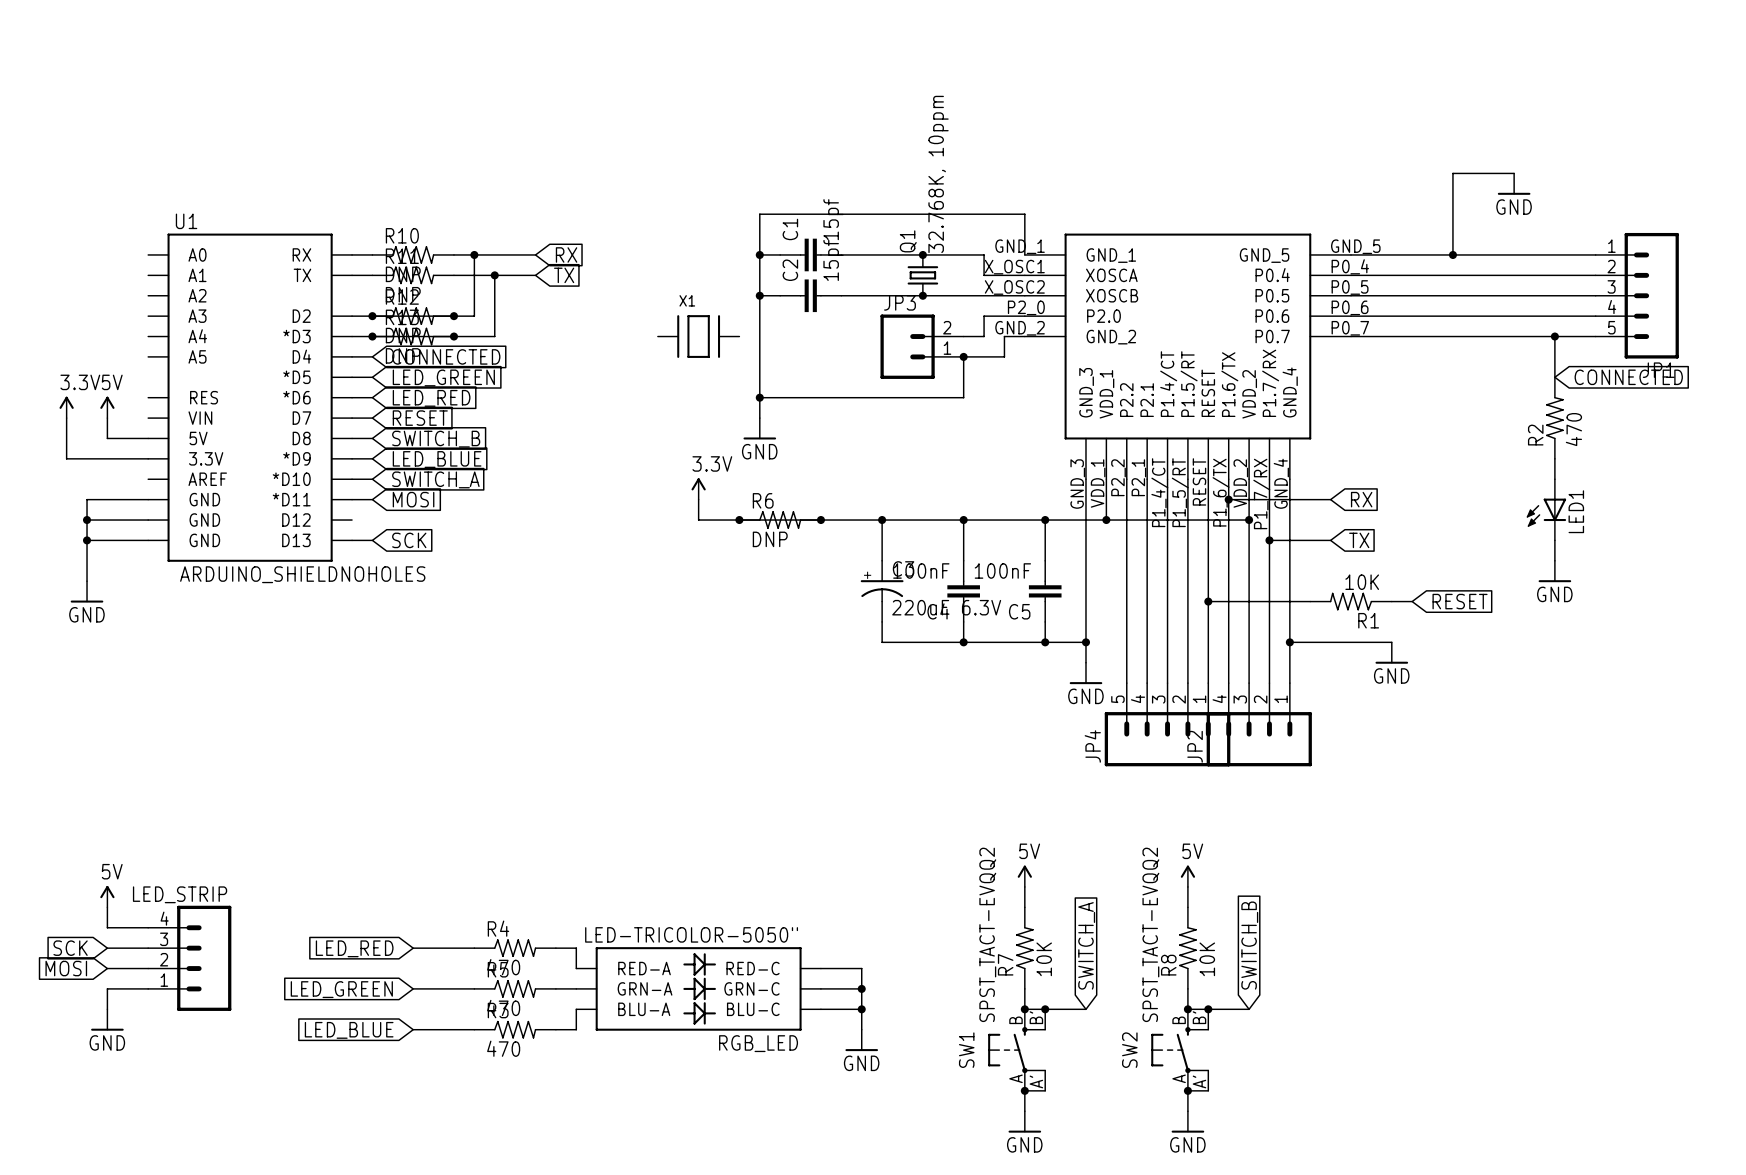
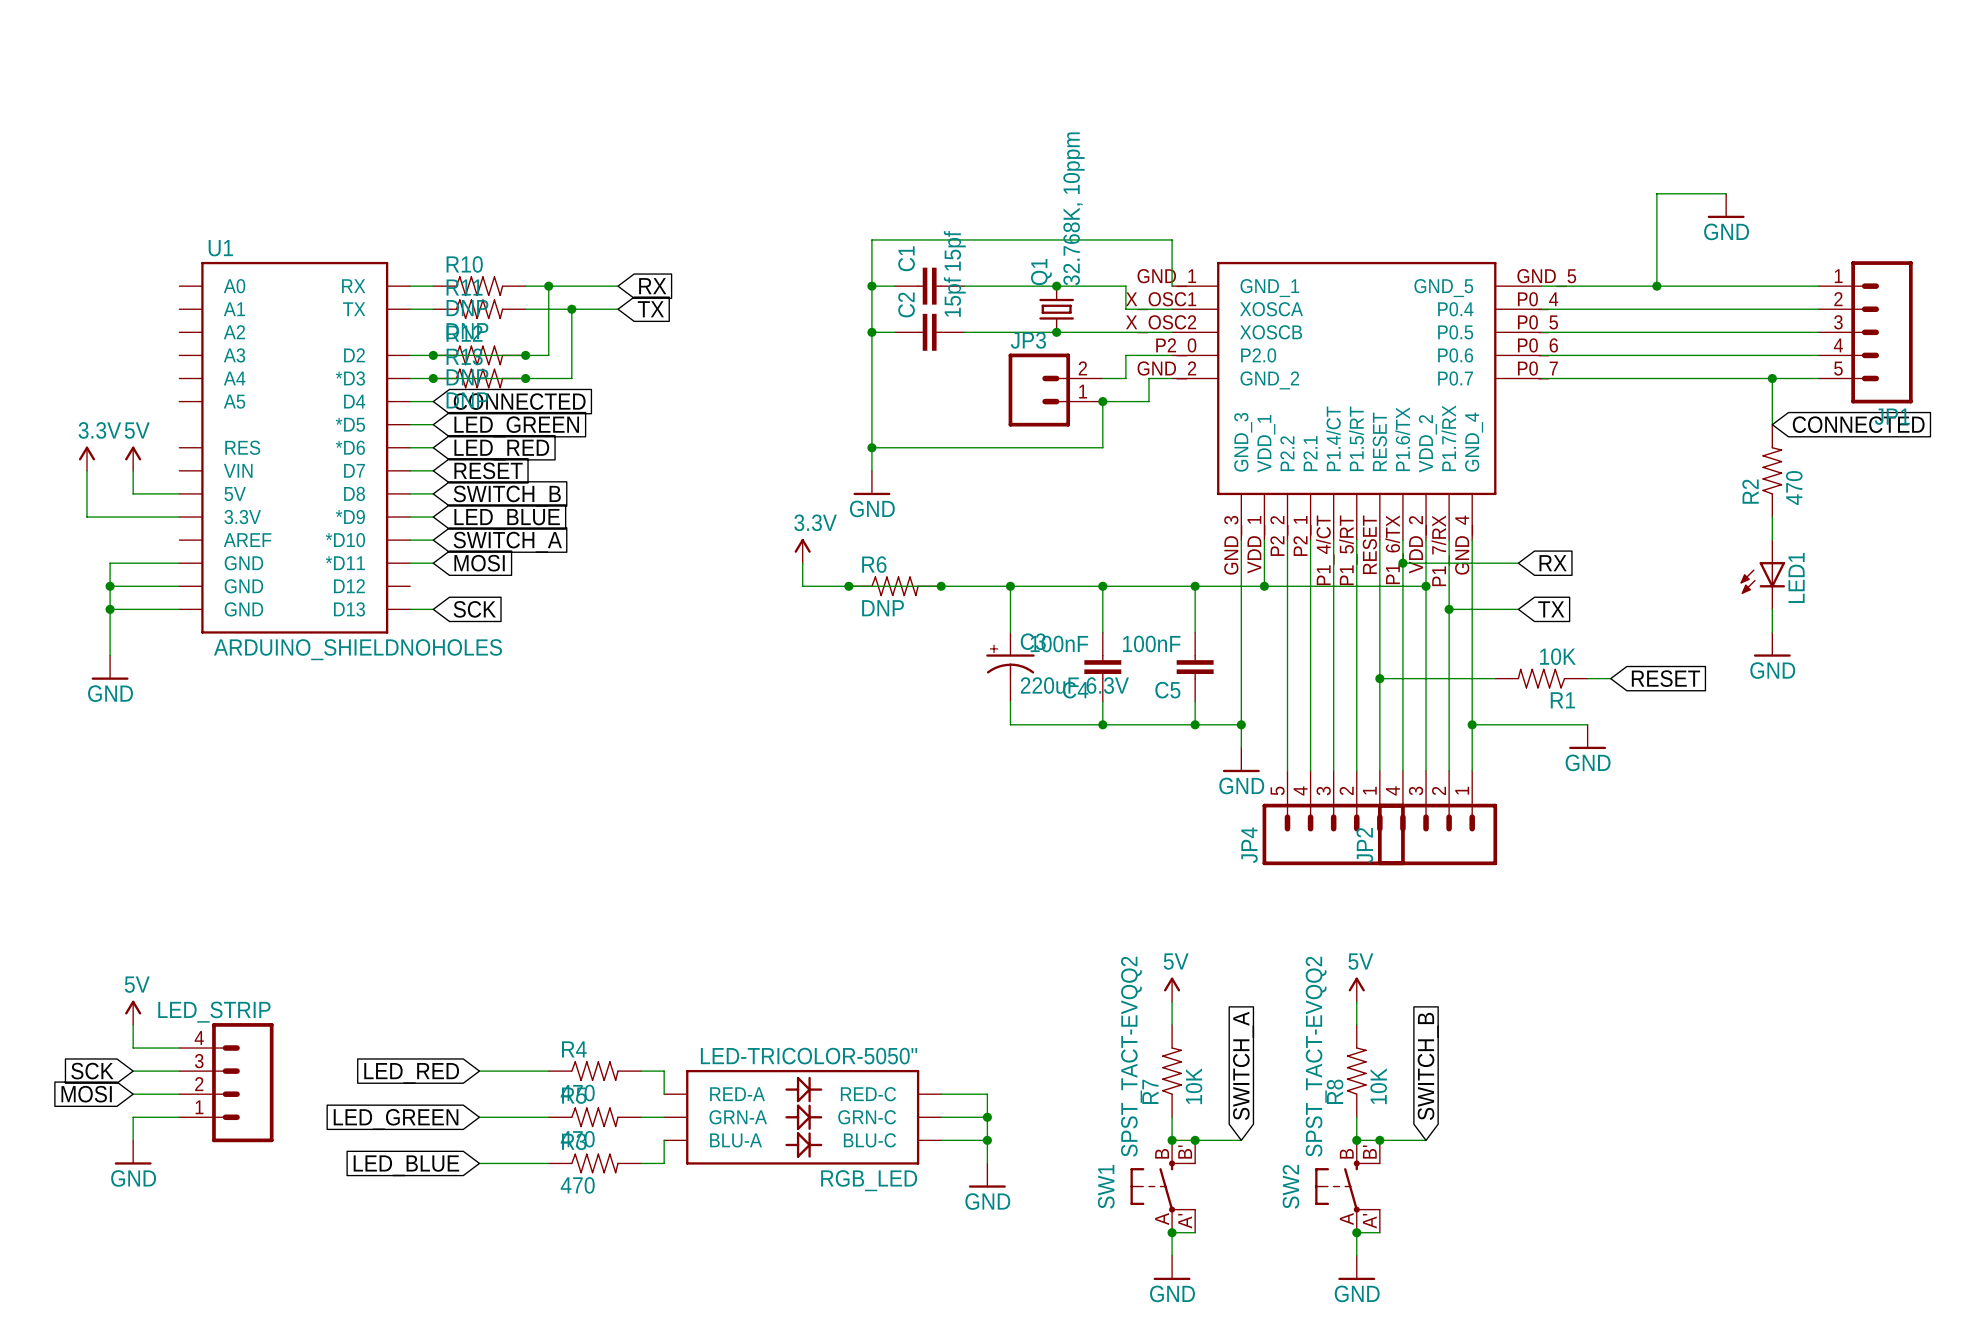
X1: (698, 336) -> none

